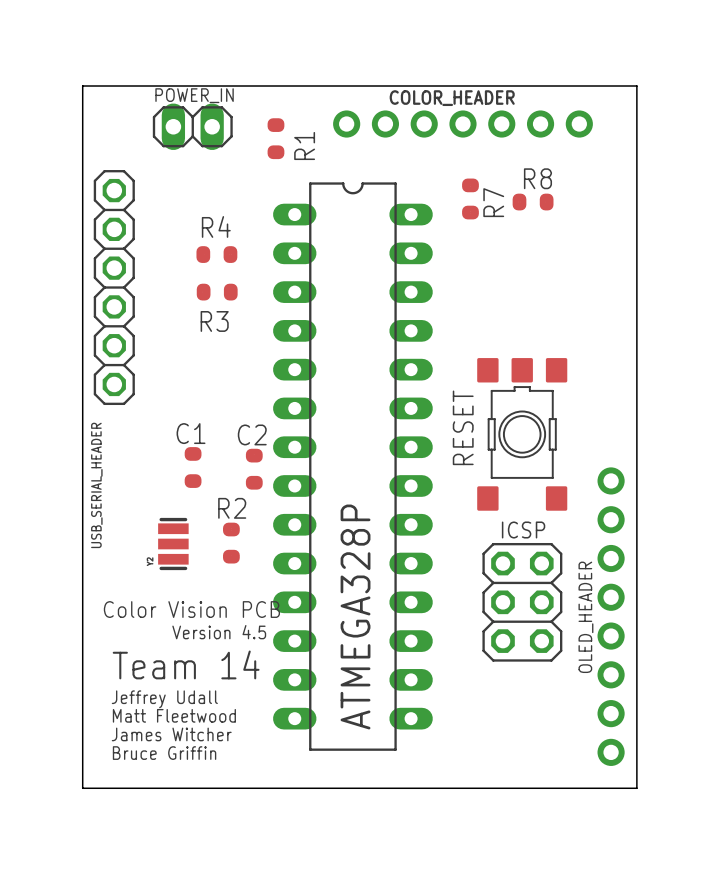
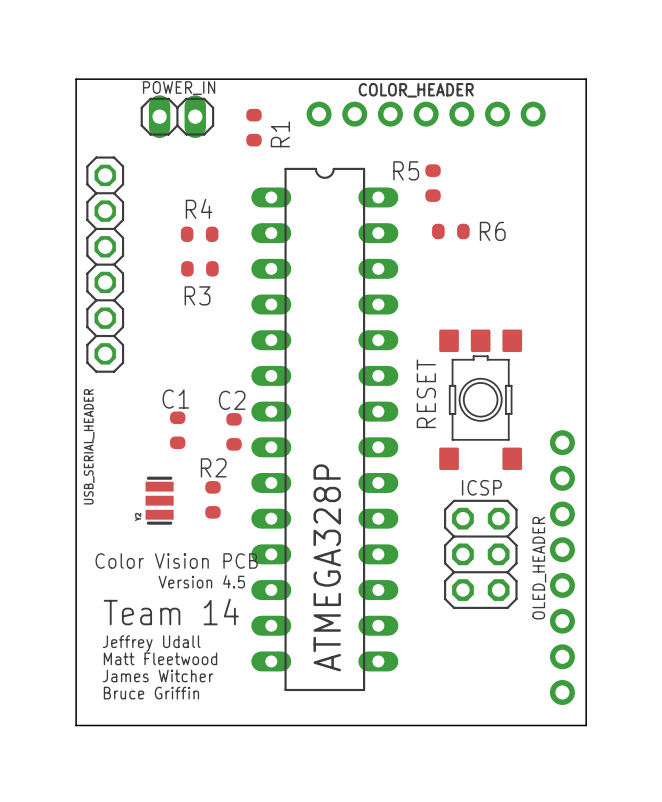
R7 name: R7 (493, 202) -> R5 (406, 170)
R8: (533, 202) -> none
R6: none -> (450, 231)

